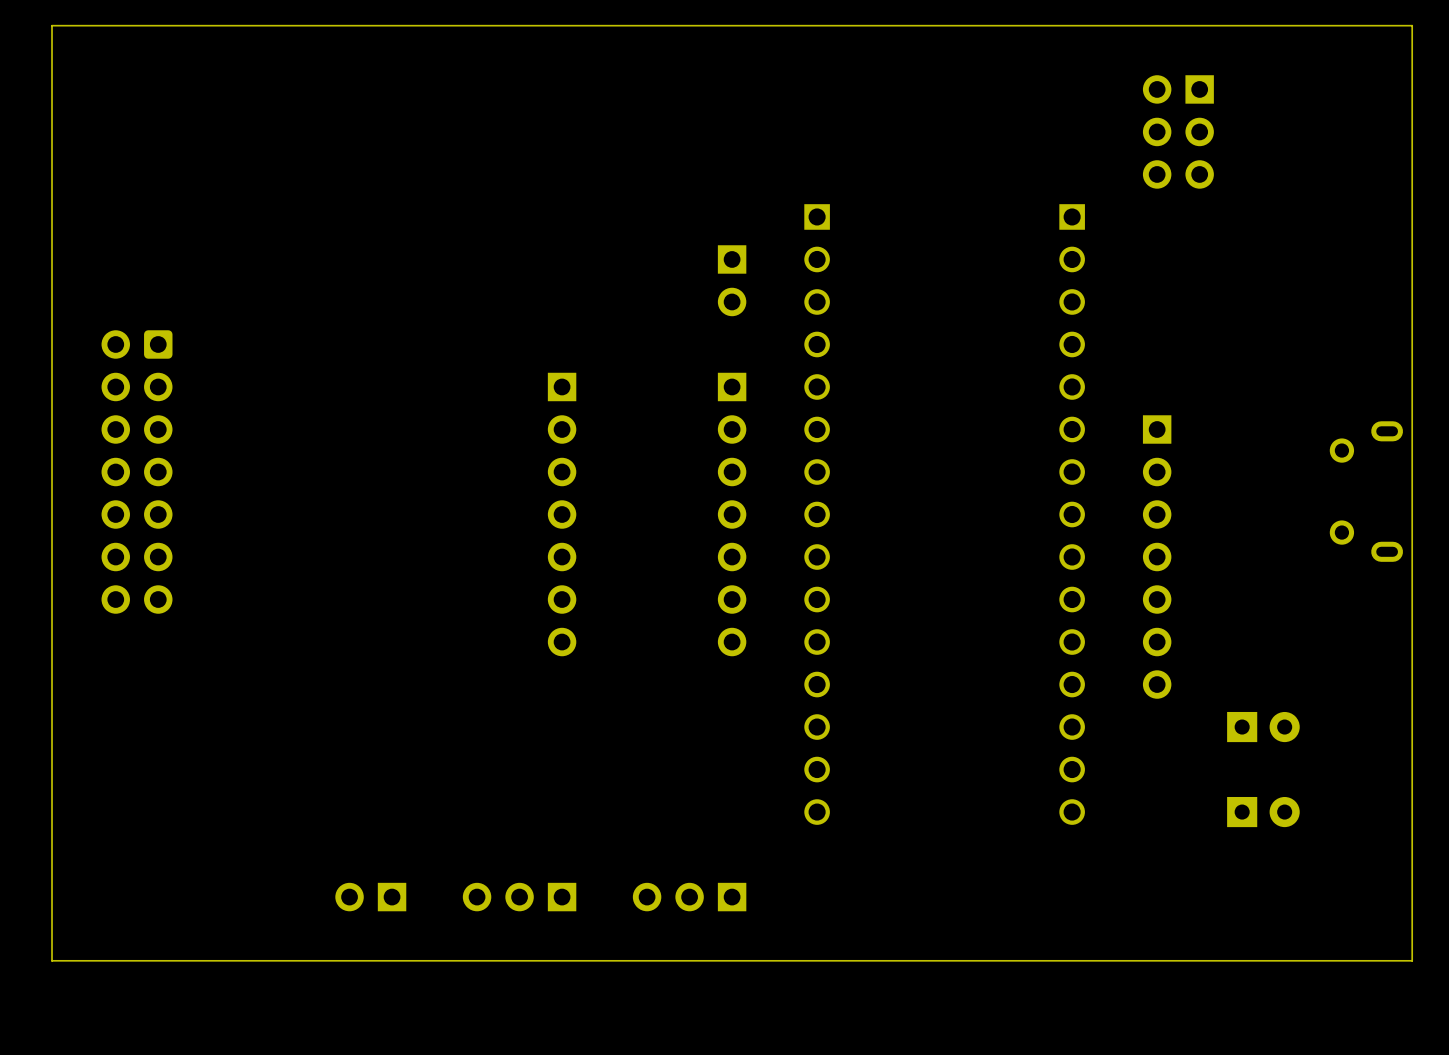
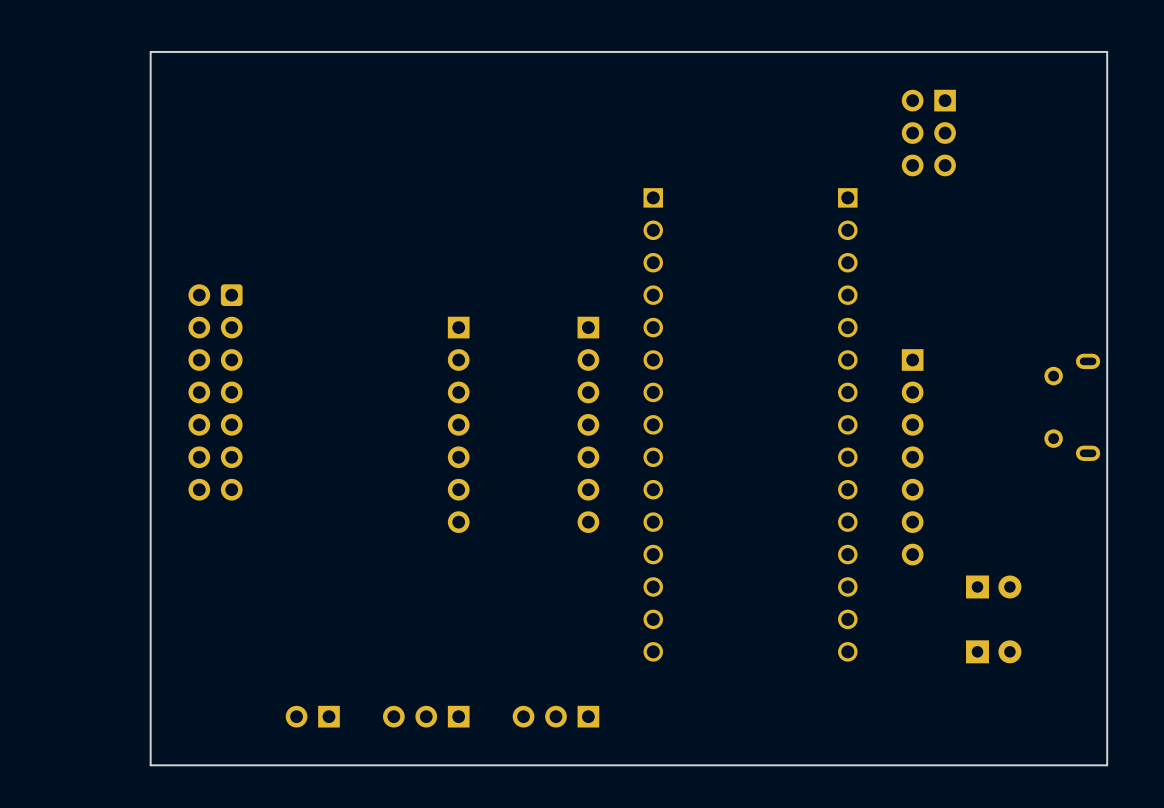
board edge: (158, 25) (52, 25) (52, 960) (158, 960) -> (150, 51) (150, 765)
part: (732, 280) -> none
part position: (137, 472) -> (215, 392)

